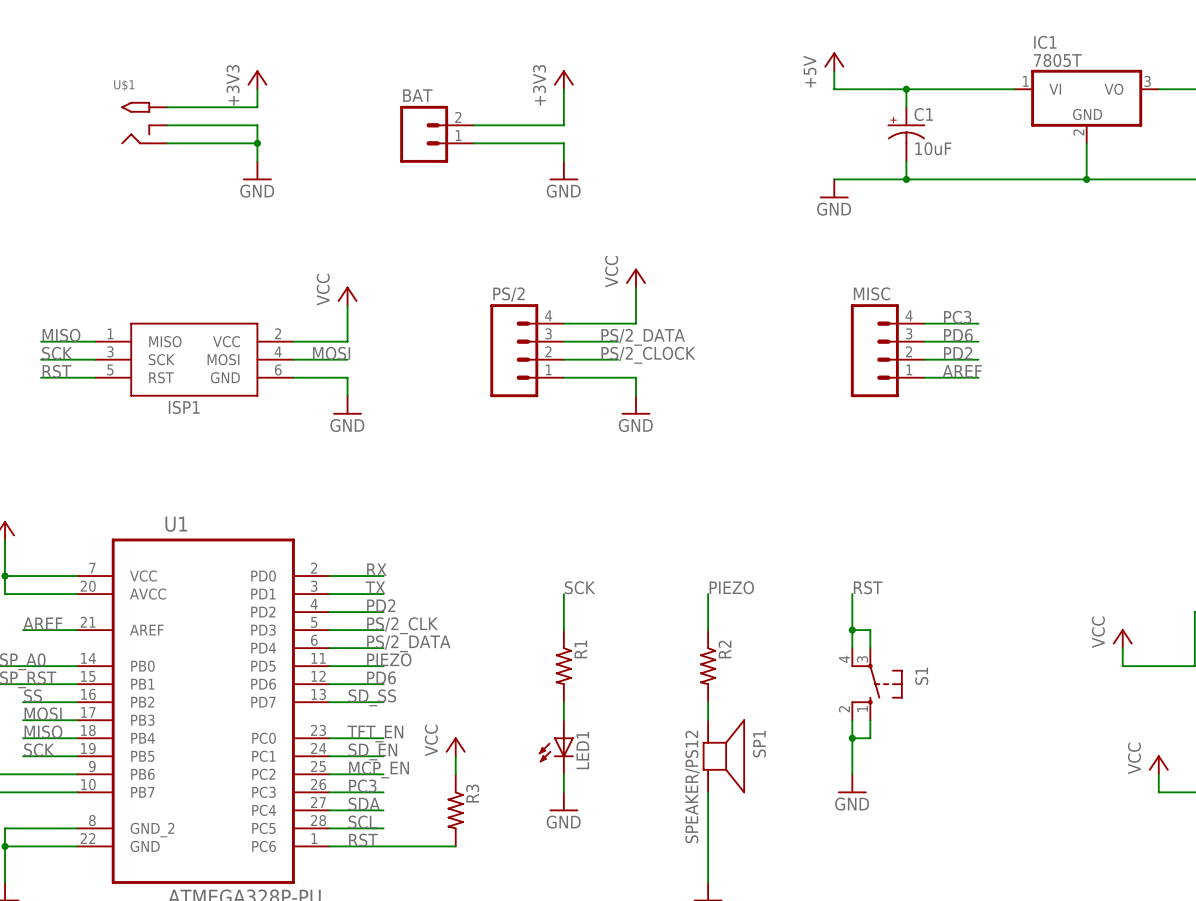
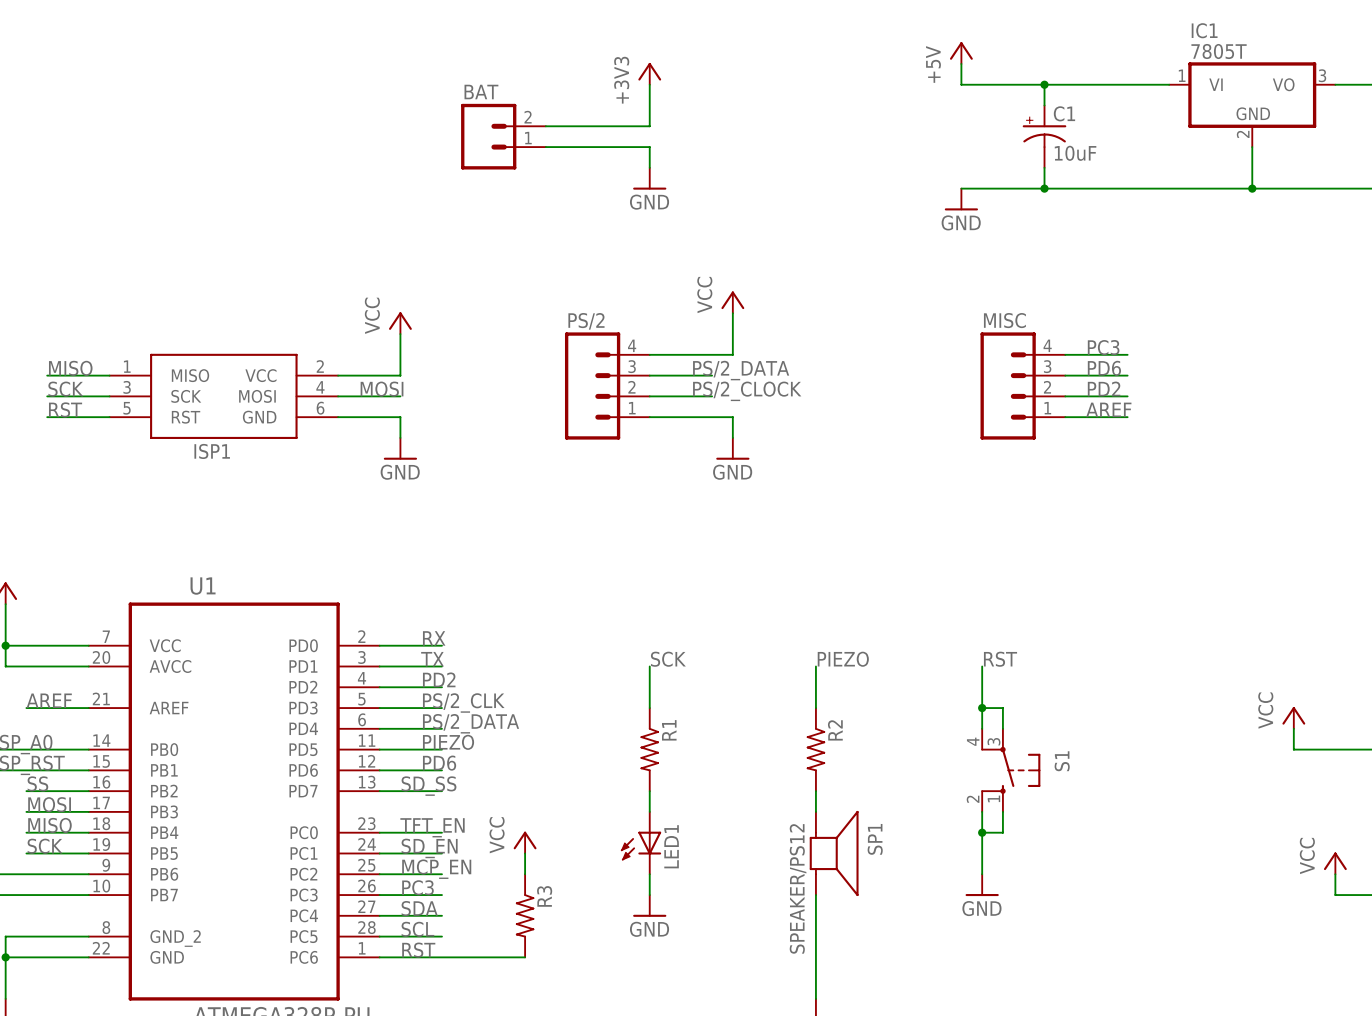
power symbol: +3V3 (257, 79) -> none
wire: (257, 89) (257, 107) (167, 107) -> none
U$1: (144, 123) -> none
wire: (167, 125) (257, 125) (257, 161) -> none
wire: (167, 143) (257, 143) -> none
junction: (257, 143) -> none
power symbol: GND (257, 170) -> none

